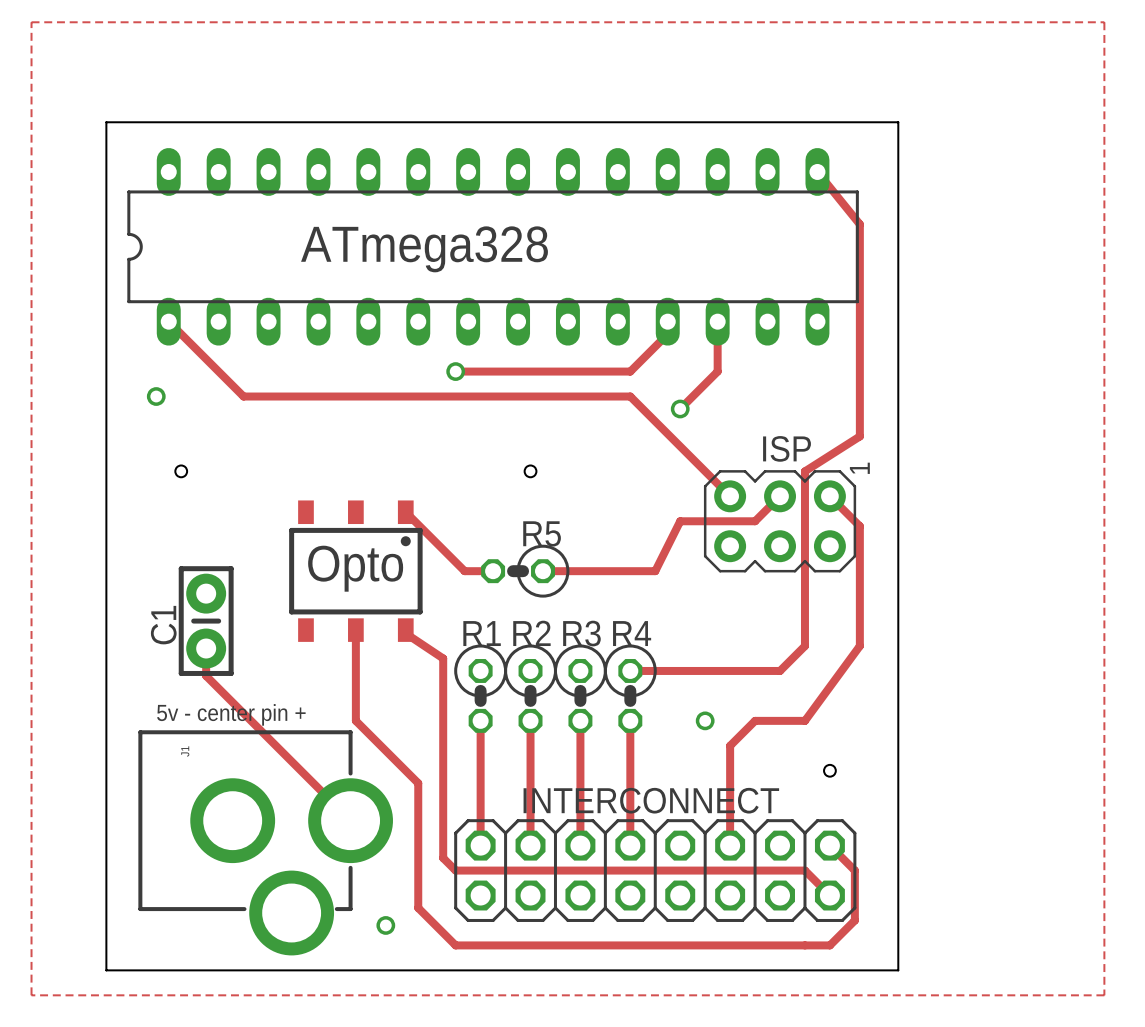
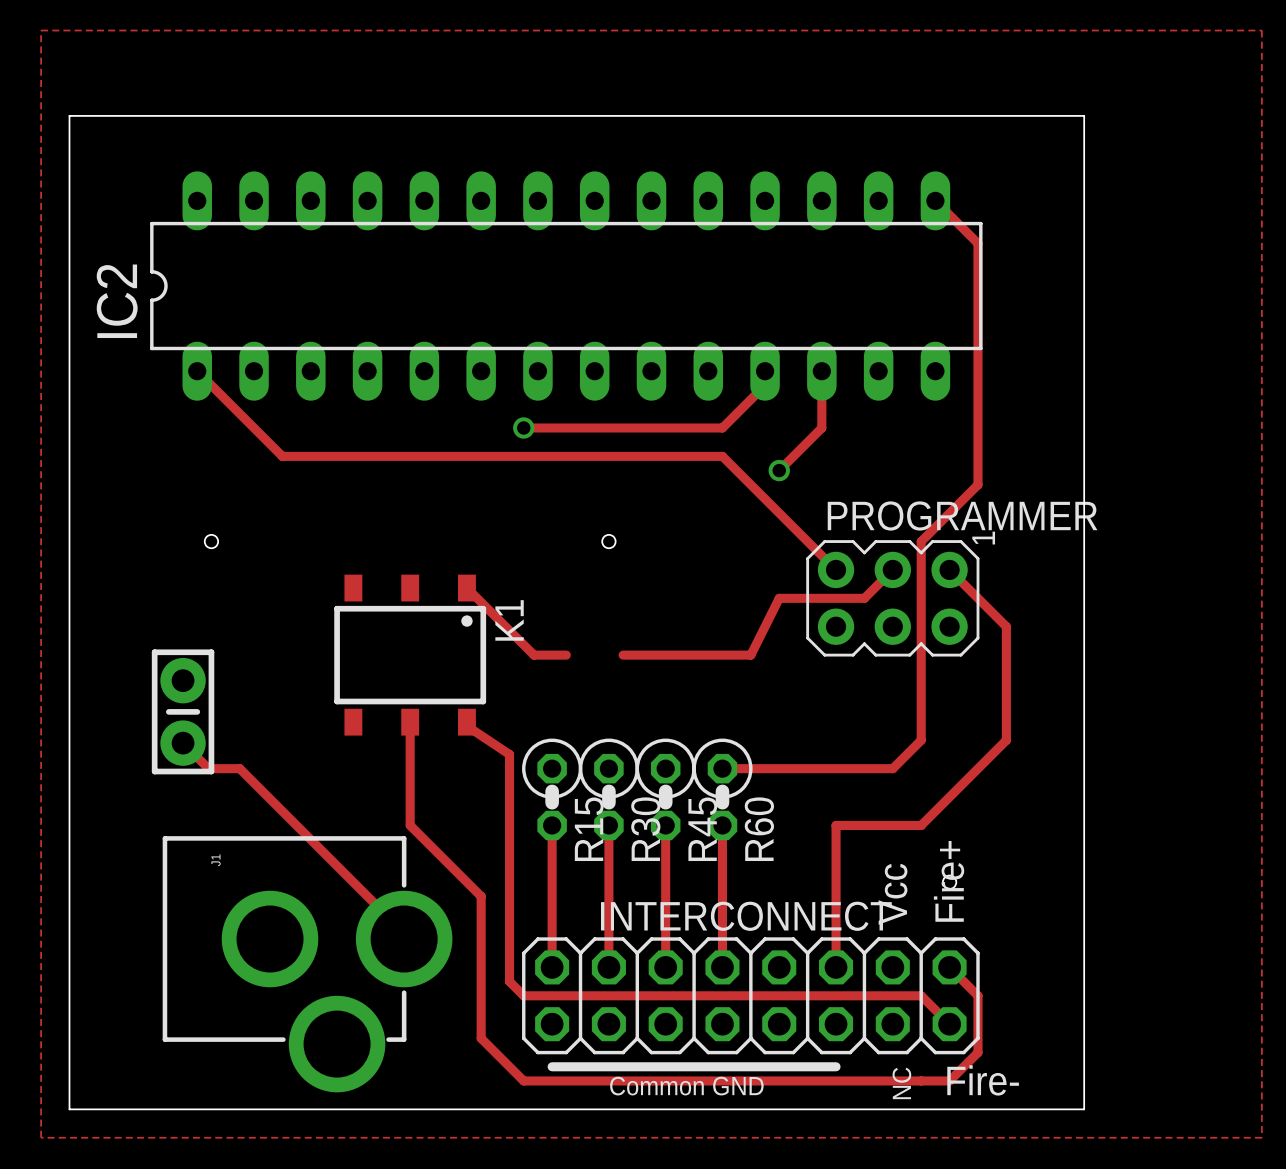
track: (817, 171) (859, 224) (859, 436) (804, 471) -> (935, 200) (977, 243) (977, 484) (921, 541)
part: (493, 246) -> none
IC2: none -> (566, 286)
text: ATmega328 (424, 249) -> none
via: (156, 396) -> none
ISP name: ISP (787, 448) -> PROGRAMMER (962, 515)
track: (859, 526) (859, 646) (804, 720) -> (983, 604) (1006, 626) (1006, 740) (921, 825)
text: R5 (542, 533) -> none
K1 name: none -> K1 (509, 620)
text: Opto (355, 568) -> none
part: (525, 571) -> none
part position: (206, 621) -> (183, 711)
text: C1 (163, 625) -> none
text: R1 (482, 633) -> none
text: R2 (531, 633) -> none
text: R3 (581, 633) -> none
text: R4 (632, 633) -> none
track: (206, 648) (206, 675) (350, 820) -> (183, 743) (208, 768) (239, 768) (404, 932) (404, 938)
part: (480, 688) -> none
part: (530, 688) -> none
part: (580, 688) -> none
part: (630, 688) -> none
R15: none -> (552, 789)
R30: none -> (608, 789)
R45: none -> (665, 789)
R60: none -> (722, 789)
text: 5v - center pin + (231, 714) -> none
via: (705, 720) -> none
track: (755, 720) (730, 745) -> (864, 825) (836, 825) (836, 853)
text: none -> Fire+ (949, 881)
text: none -> Vcc (893, 894)
via: (385, 925) -> none
line: none -> (552, 1066) (836, 1066)
text: none -> Fire- (983, 1080)
text: none -> NC (901, 1083)
text: none -> Common GND (686, 1086)
board edge: (106, 970) (106, 122) (898, 122) (898, 970) -> (126, 1109) (69, 1109) (69, 115) (1084, 115) (1084, 1109) (1027, 1109)

